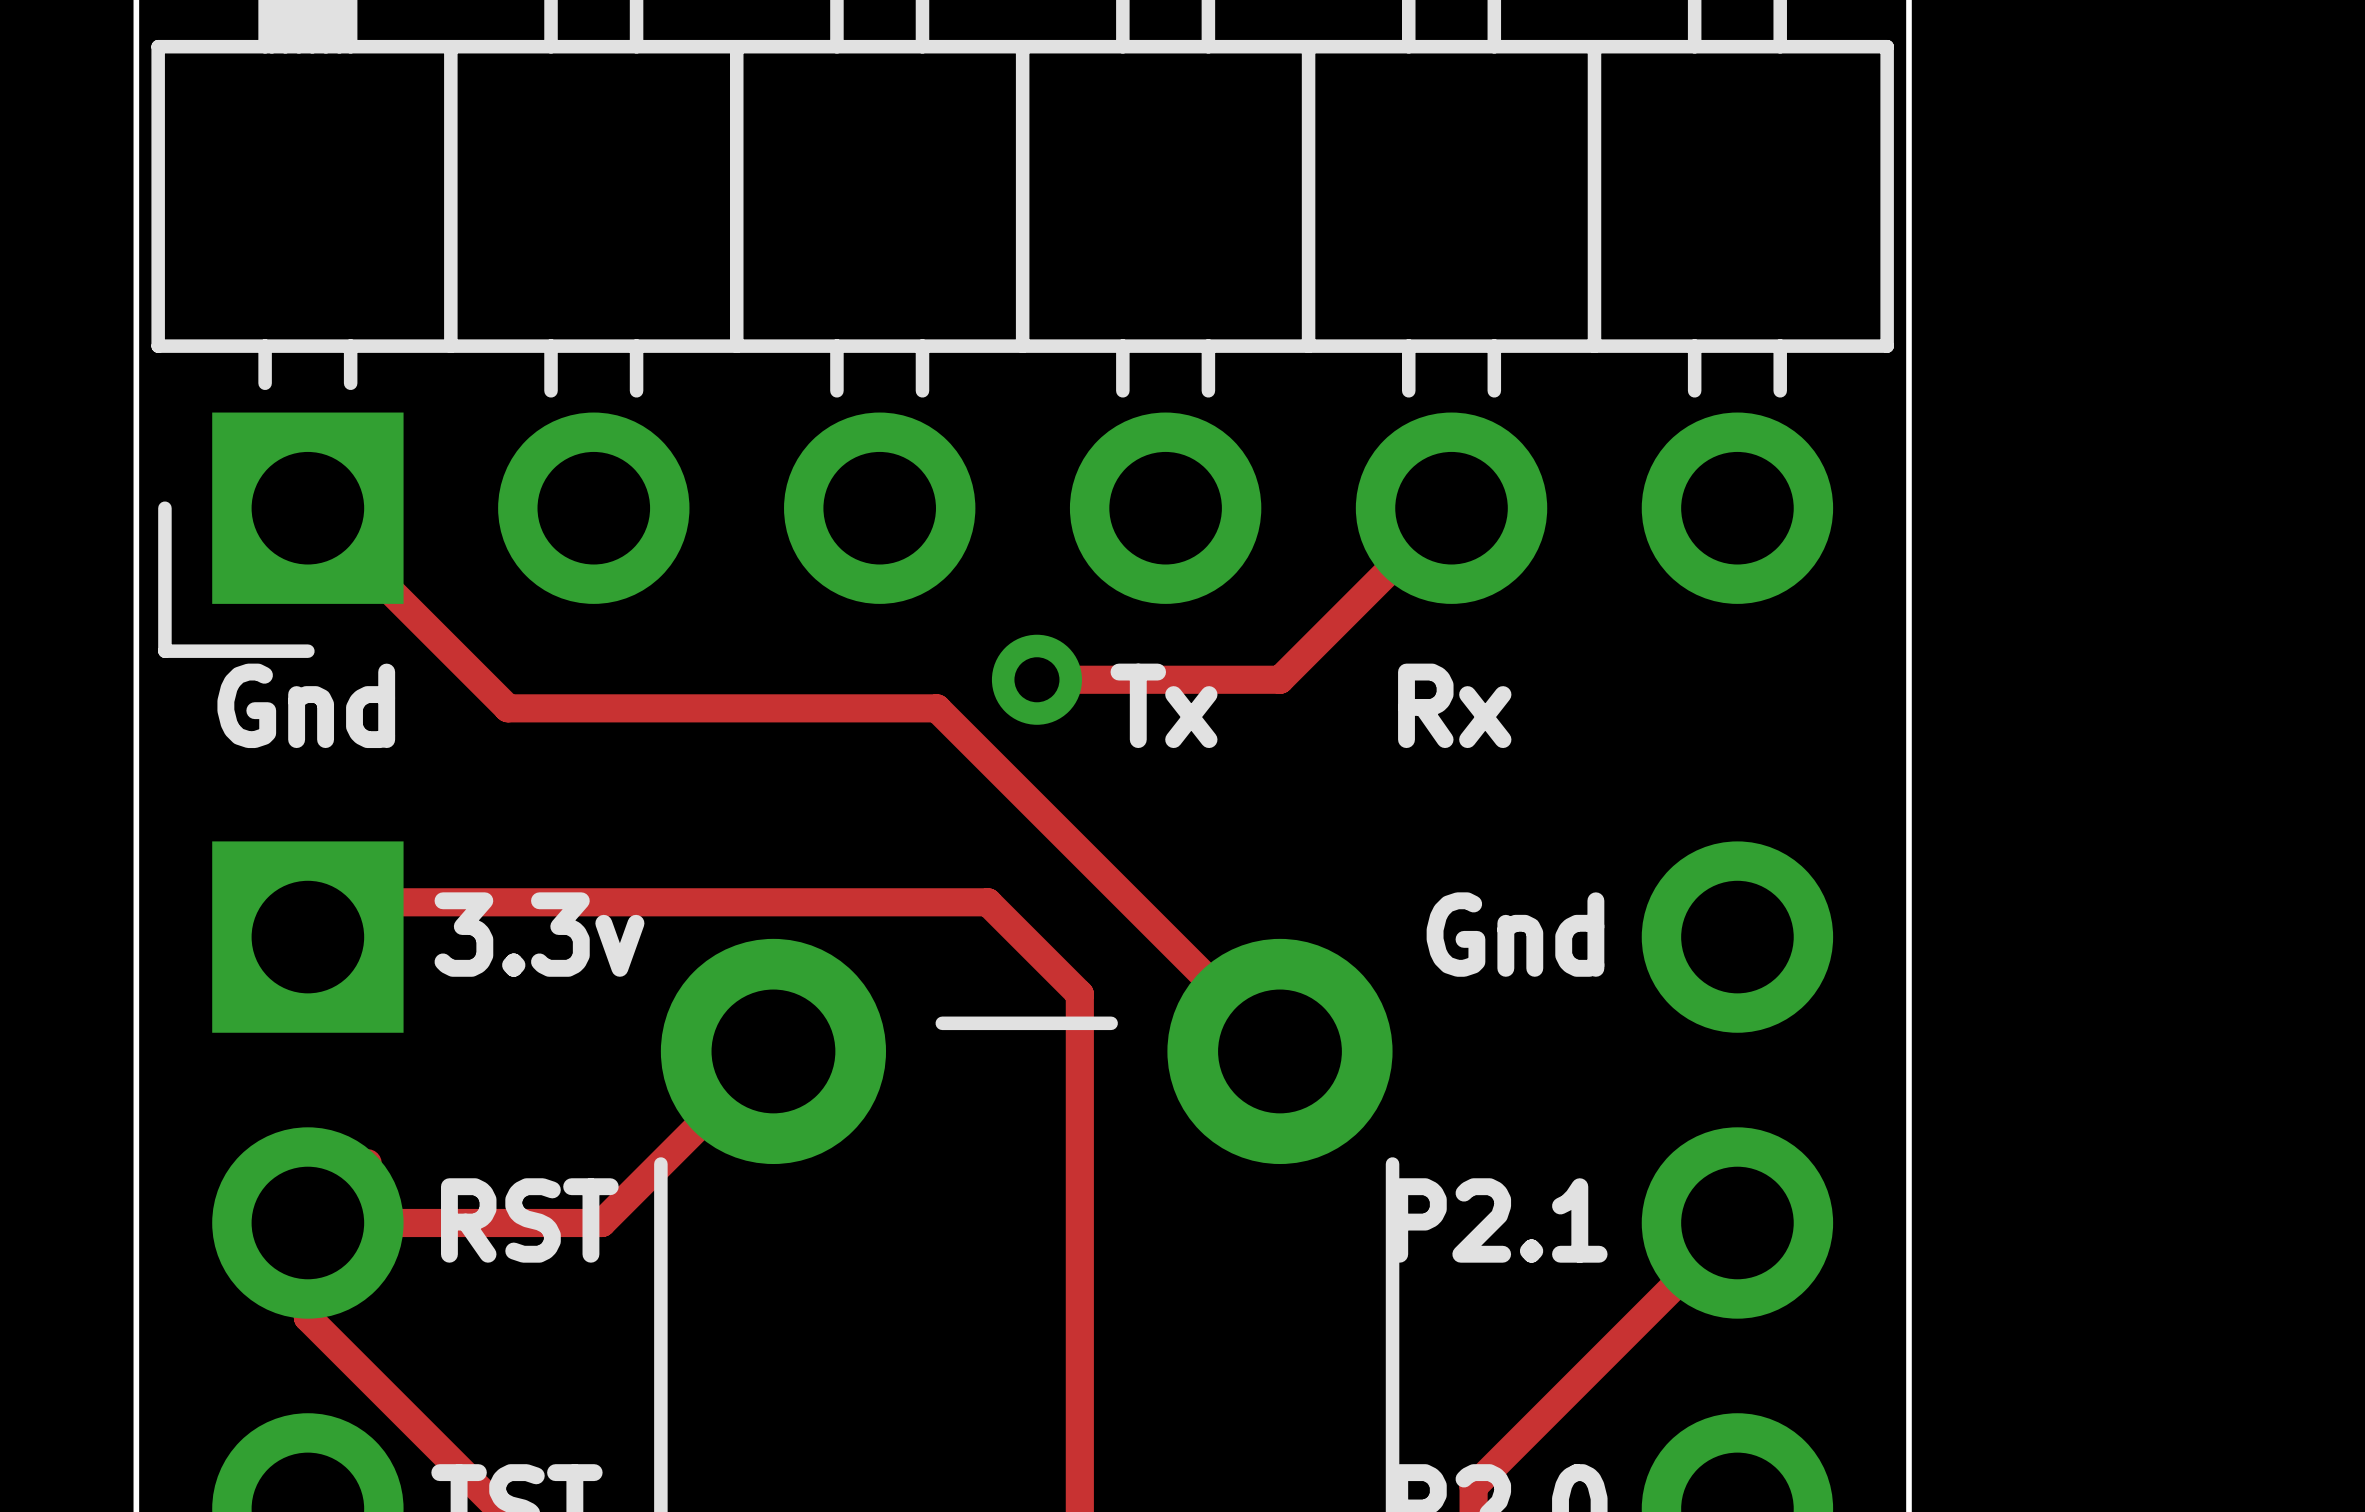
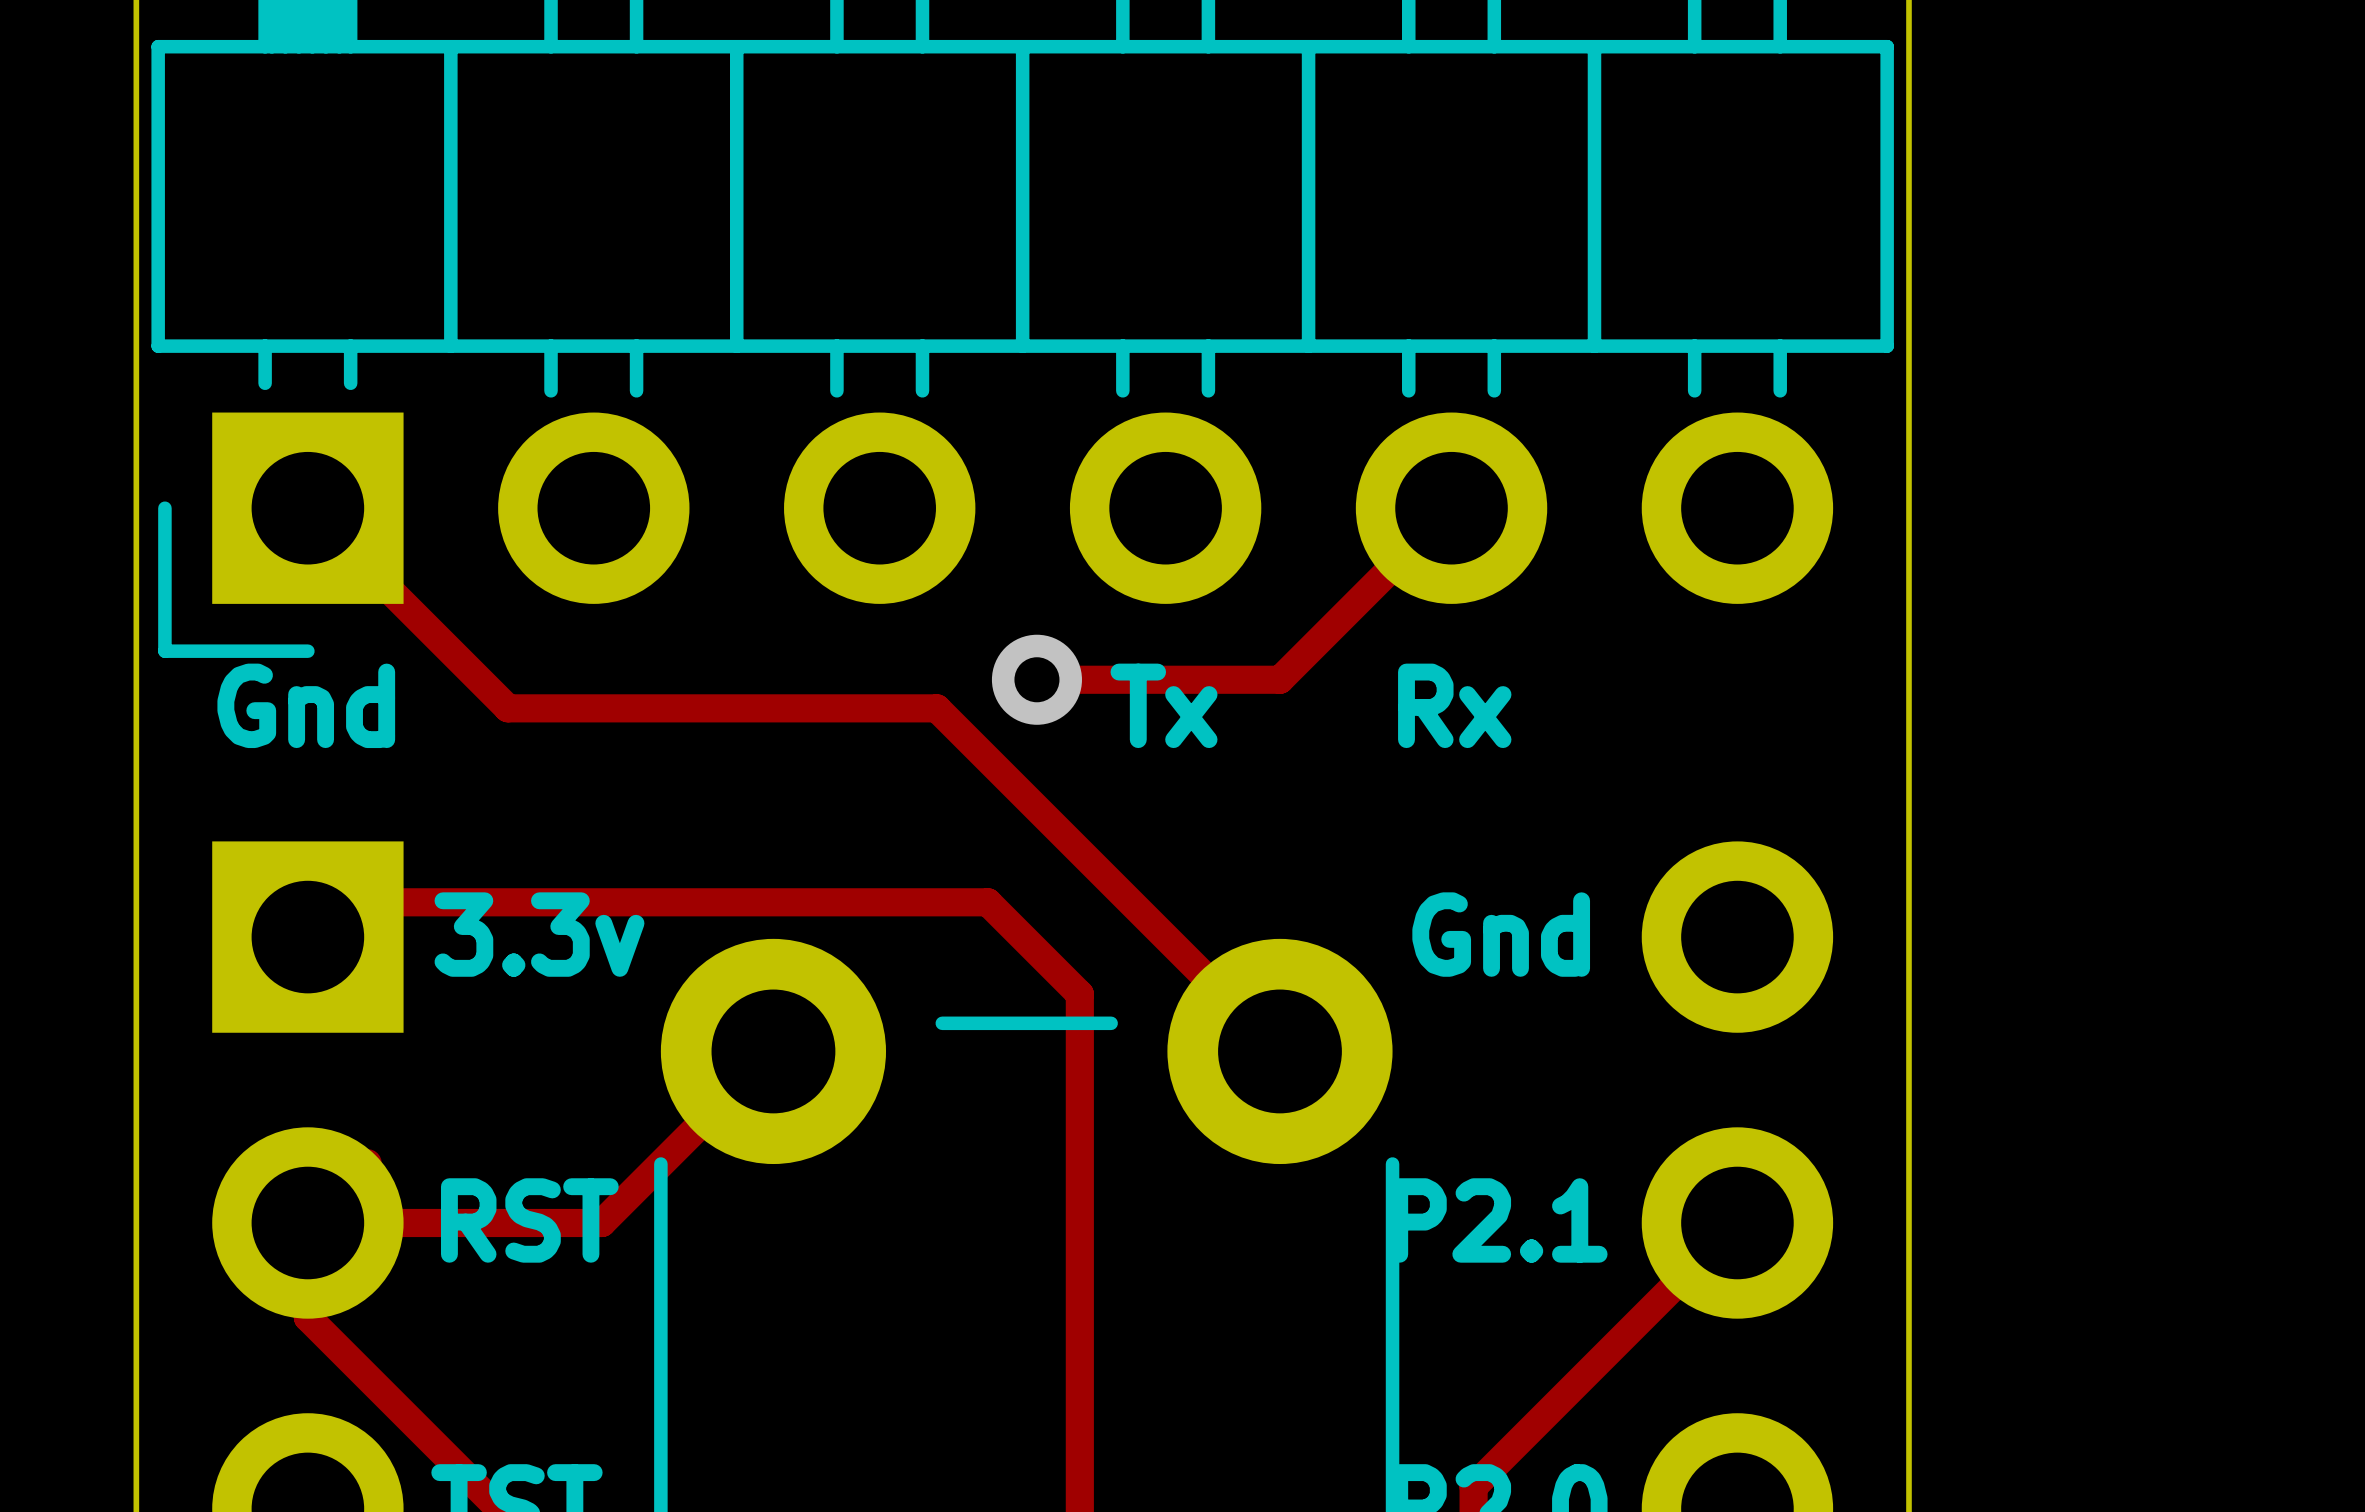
text position: Gnd (1515, 934) -> Gnd (1501, 934)

